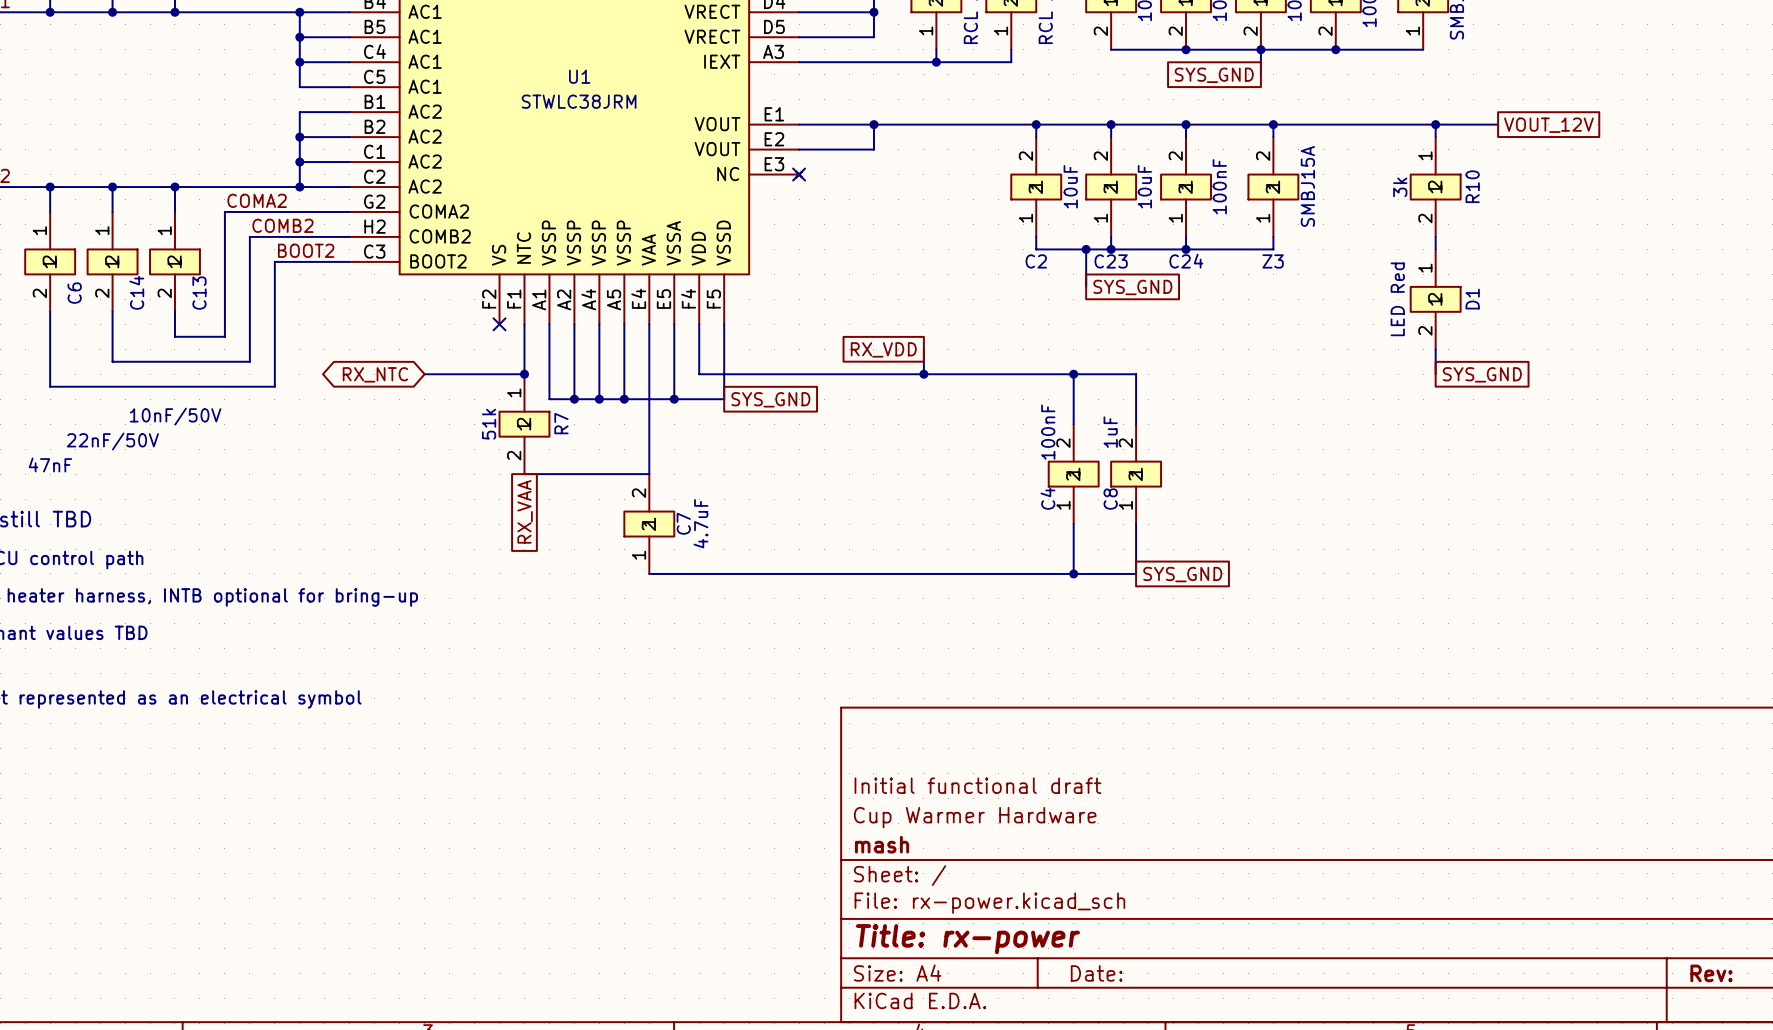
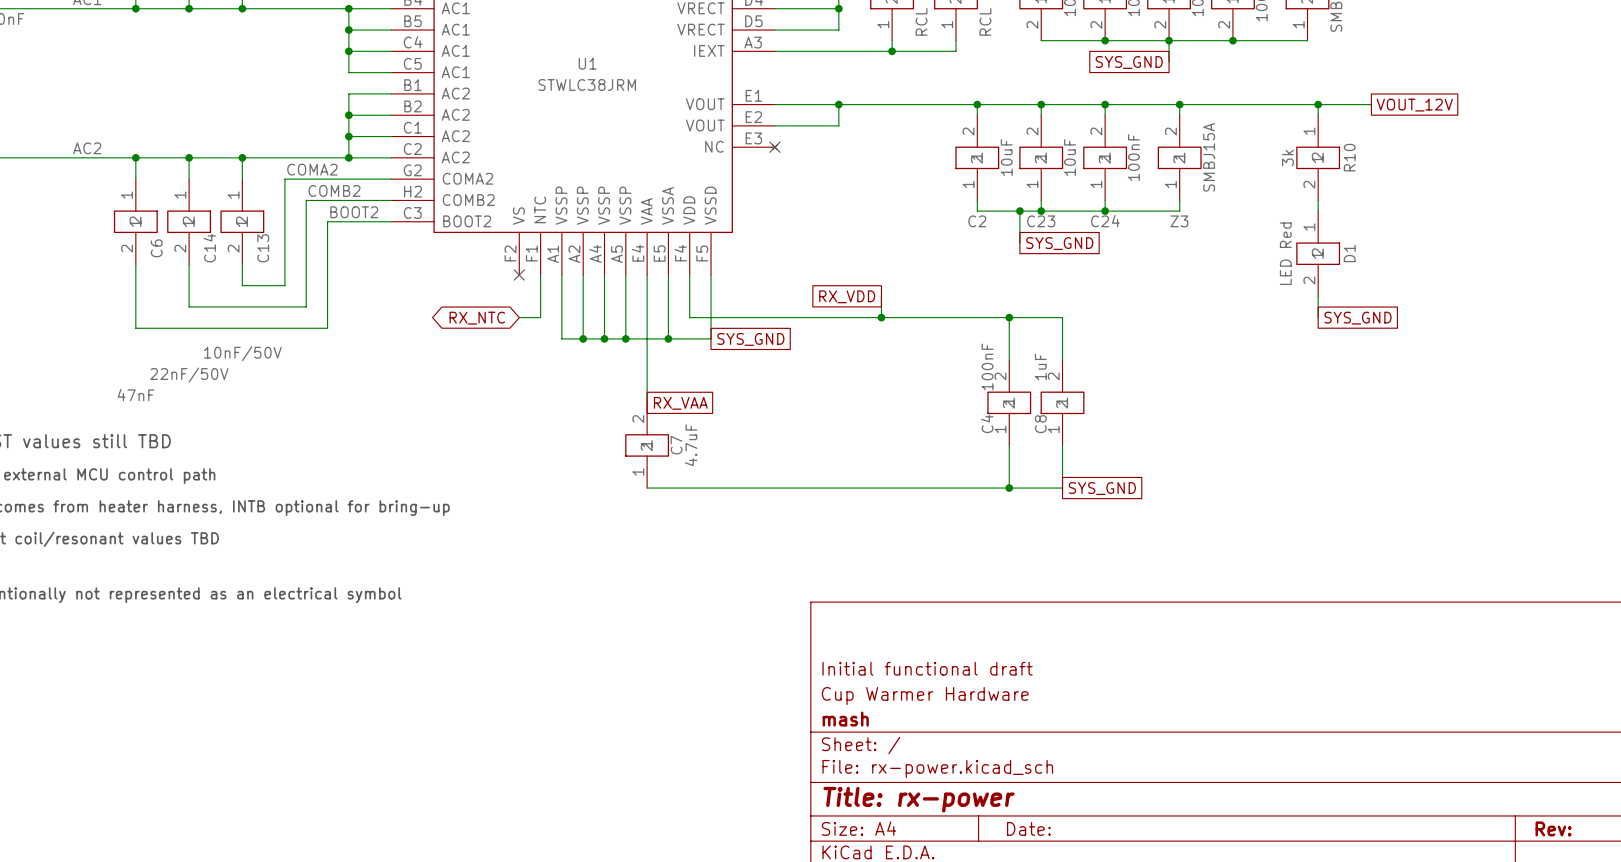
global label position: RX_NTC (375, 374) -> RX_NTC (477, 318)
wire: (424, 374) (499, 374) -> none
junction: (524, 374) -> none
R7: 51k (524, 424) -> none
wire: (524, 474) (649, 474) -> none
global label rotation: 0° (525, 511) -> 90° counterclockwise (680, 403)
global label position: RX_VAA (525, 511) -> RX_VAA (680, 403)

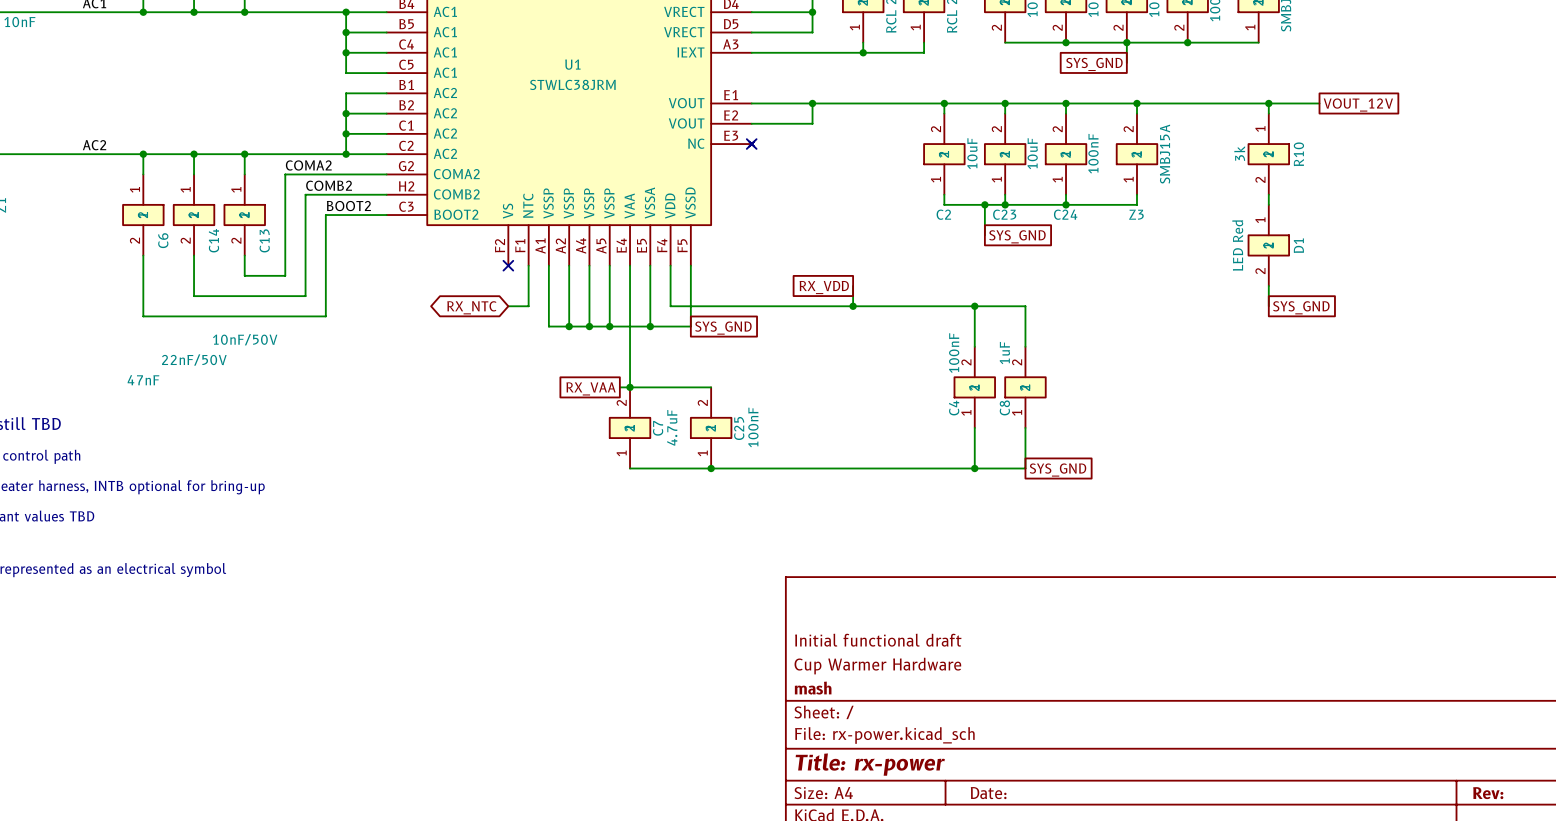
wire: none -> (619, 387) (711, 387)
junction: none -> (630, 387)
global label rotation: 0° (680, 403) -> 180° (591, 388)
global label position: RX_VAA (680, 403) -> RX_VAA (591, 388)
C25: none -> 100nF (711, 427)
junction: none -> (711, 468)

